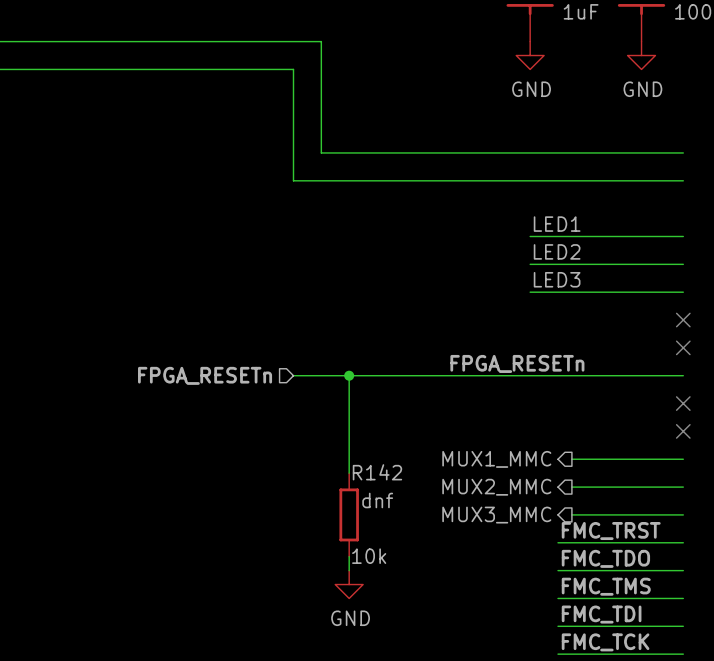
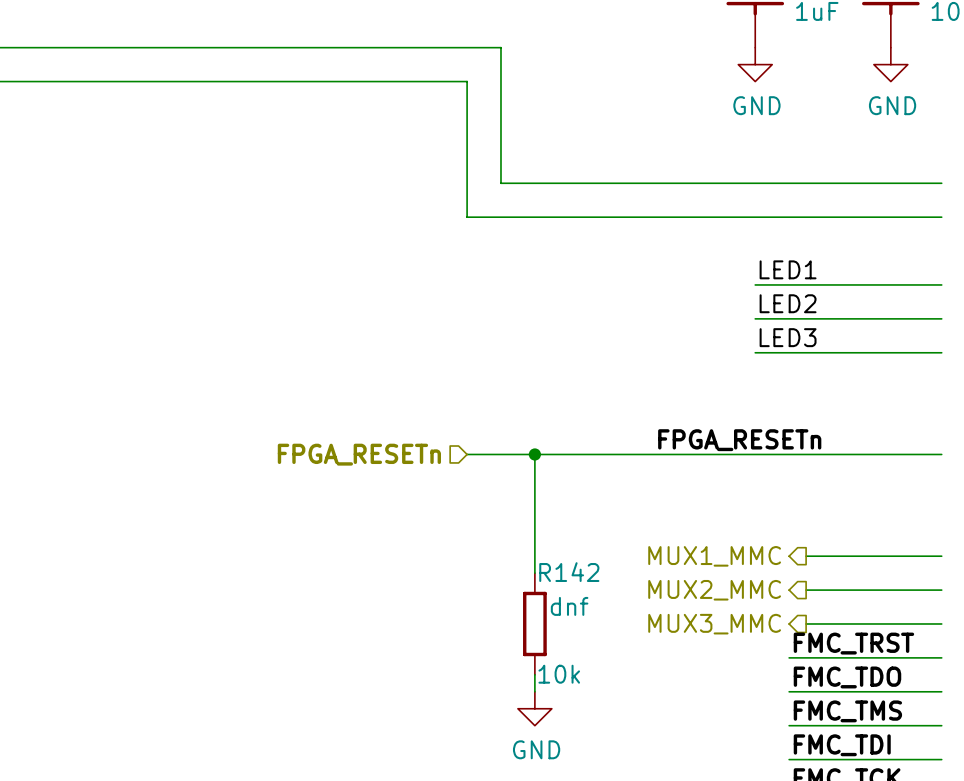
no-connect mark: (683, 320) -> none
no-connect mark: (683, 347) -> none
no-connect mark: (683, 403) -> none
no-connect mark: (683, 431) -> none

